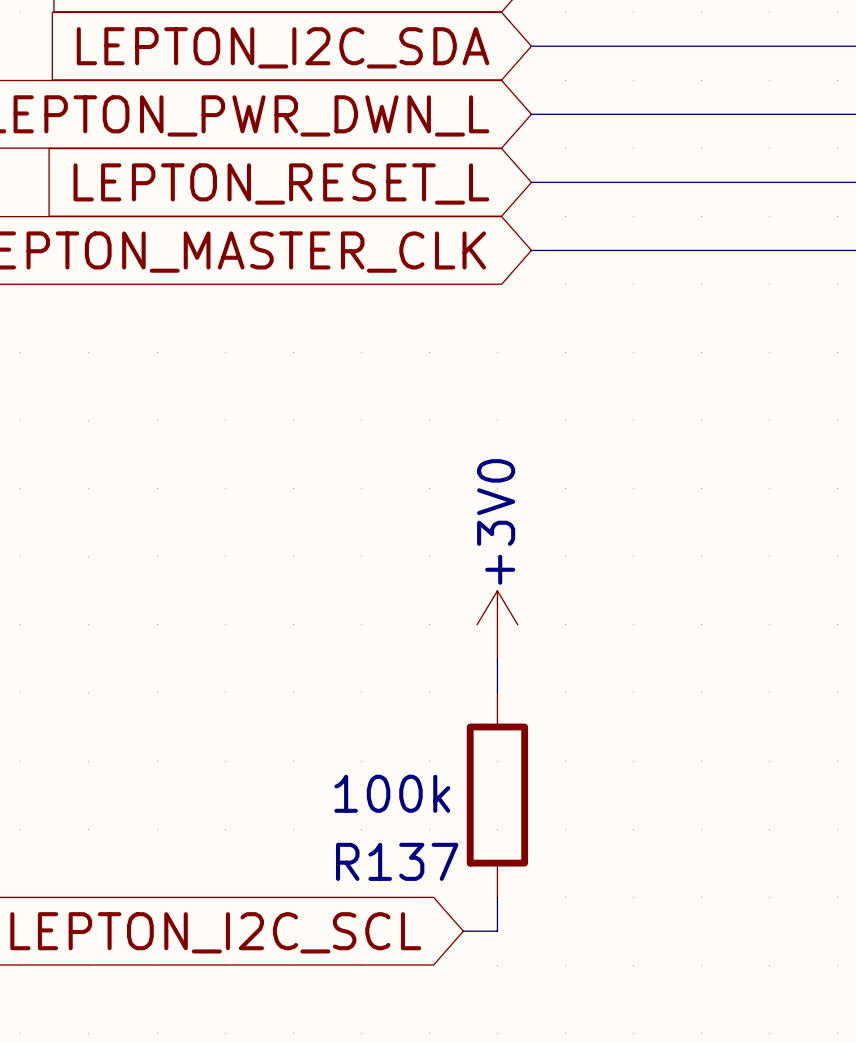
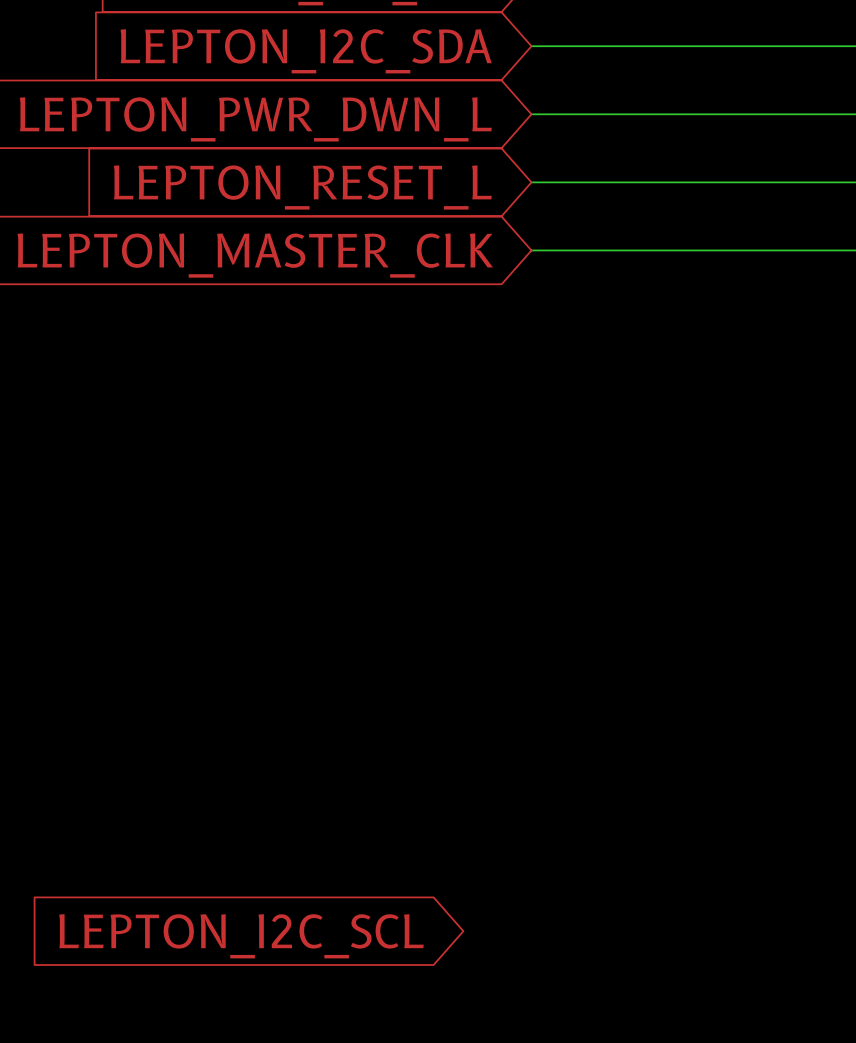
power symbol: +3V0 (497, 624) -> none
wire: (497, 658) (497, 692) -> none
R137: 100k (497, 795) -> none
wire: (497, 897) (497, 931) (463, 931) -> none

